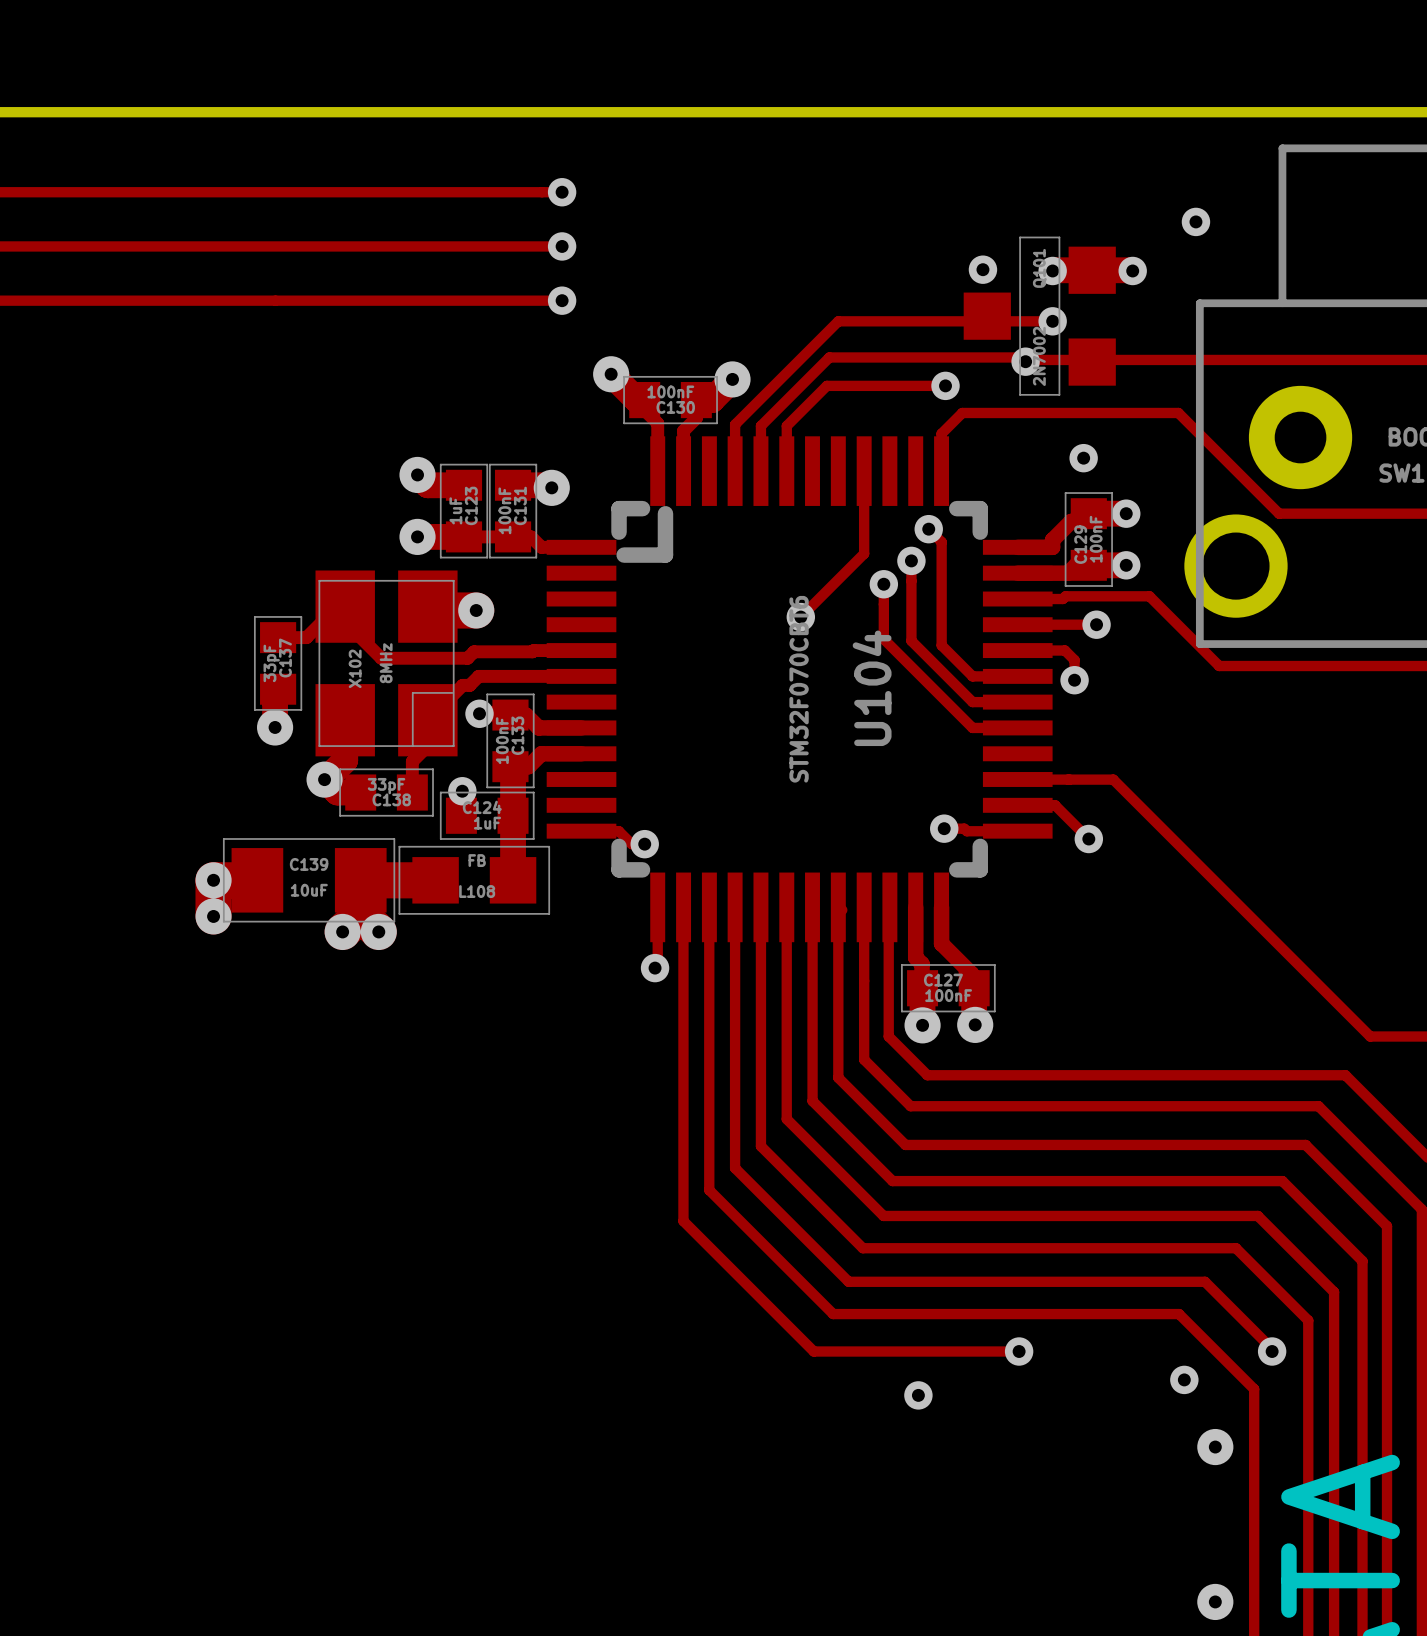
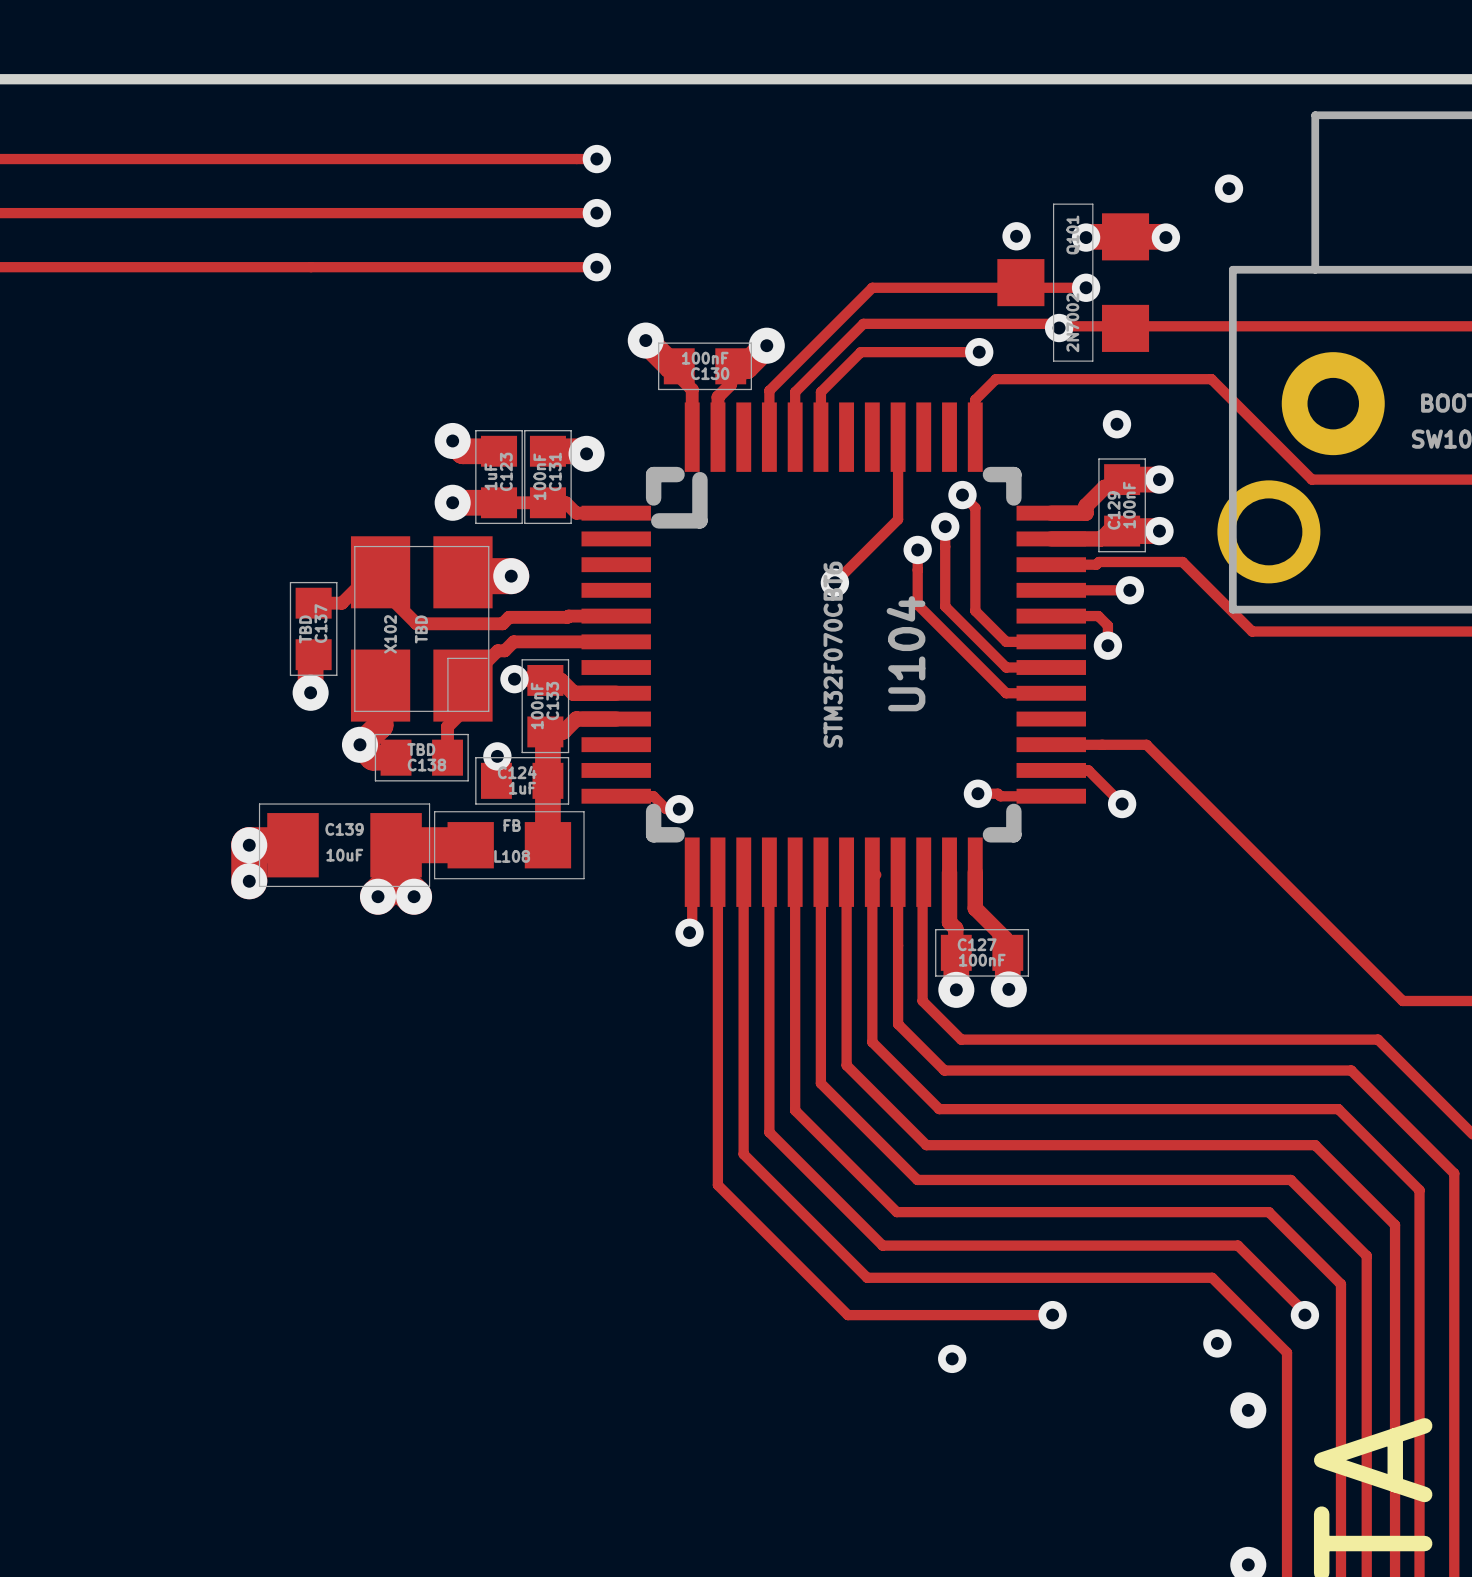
C137 value: 33pF (271, 663) -> TBD (305, 629)
X102 value: 8MHz (386, 663) -> TBD (421, 629)
C138 value: 33pF (386, 786) -> TBD (421, 749)

